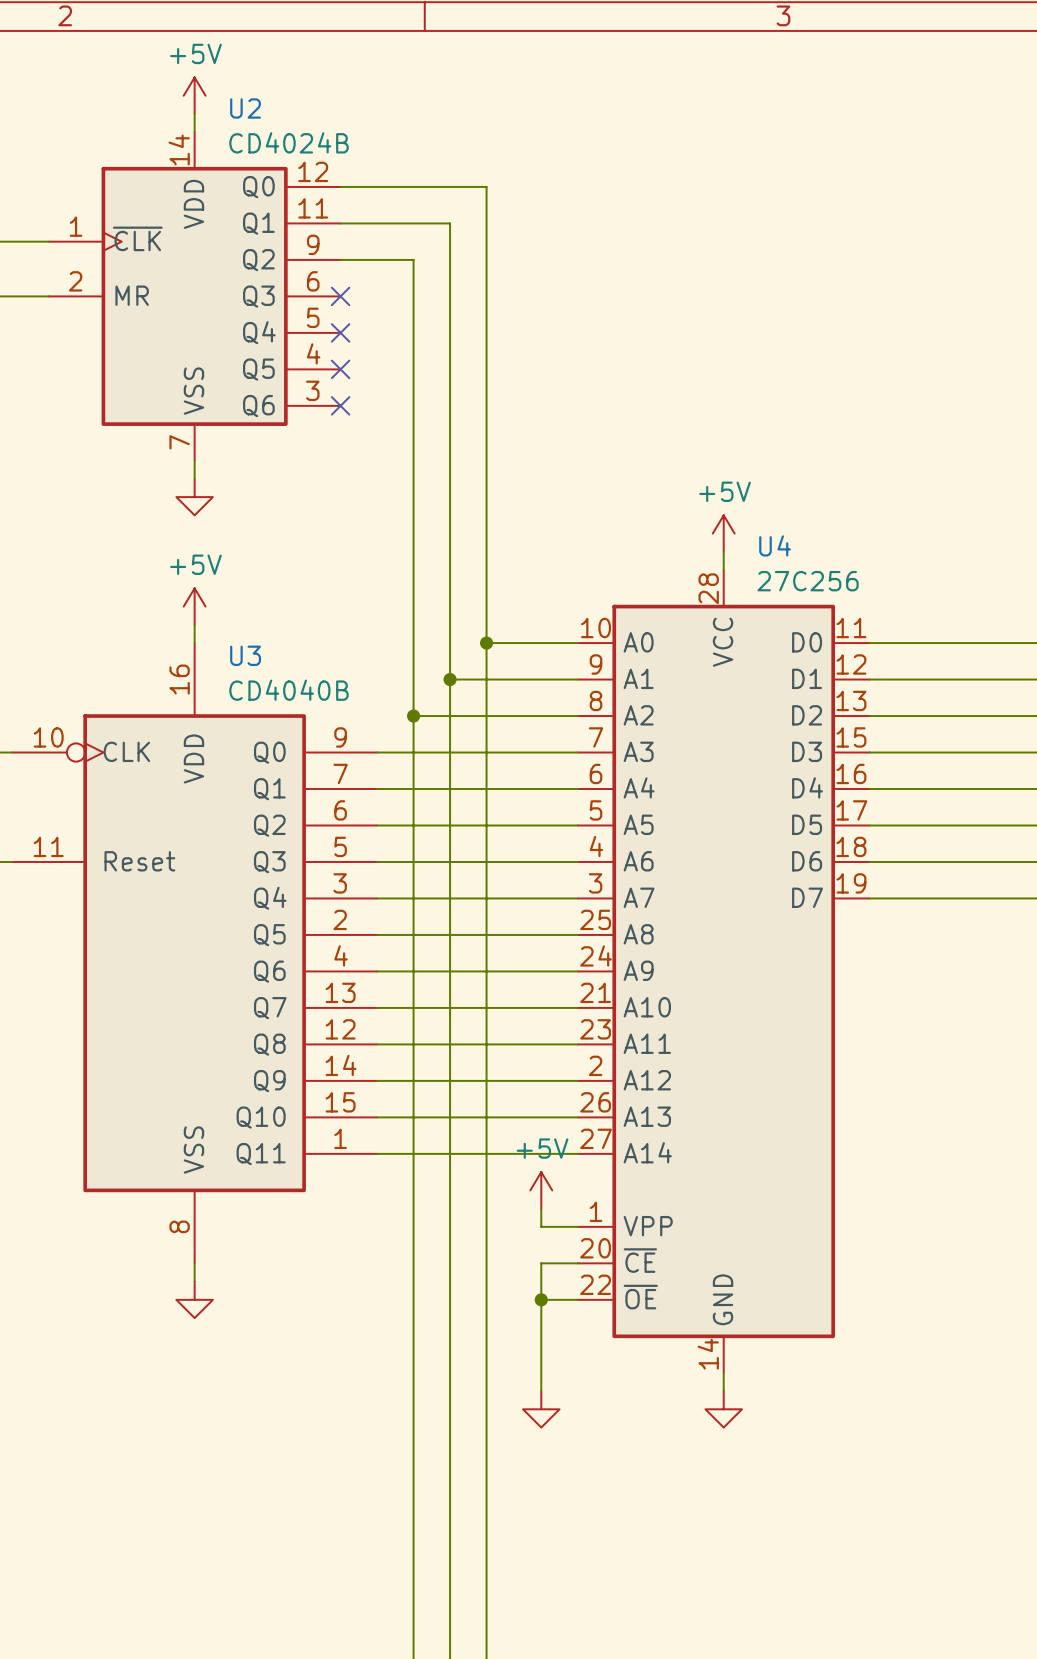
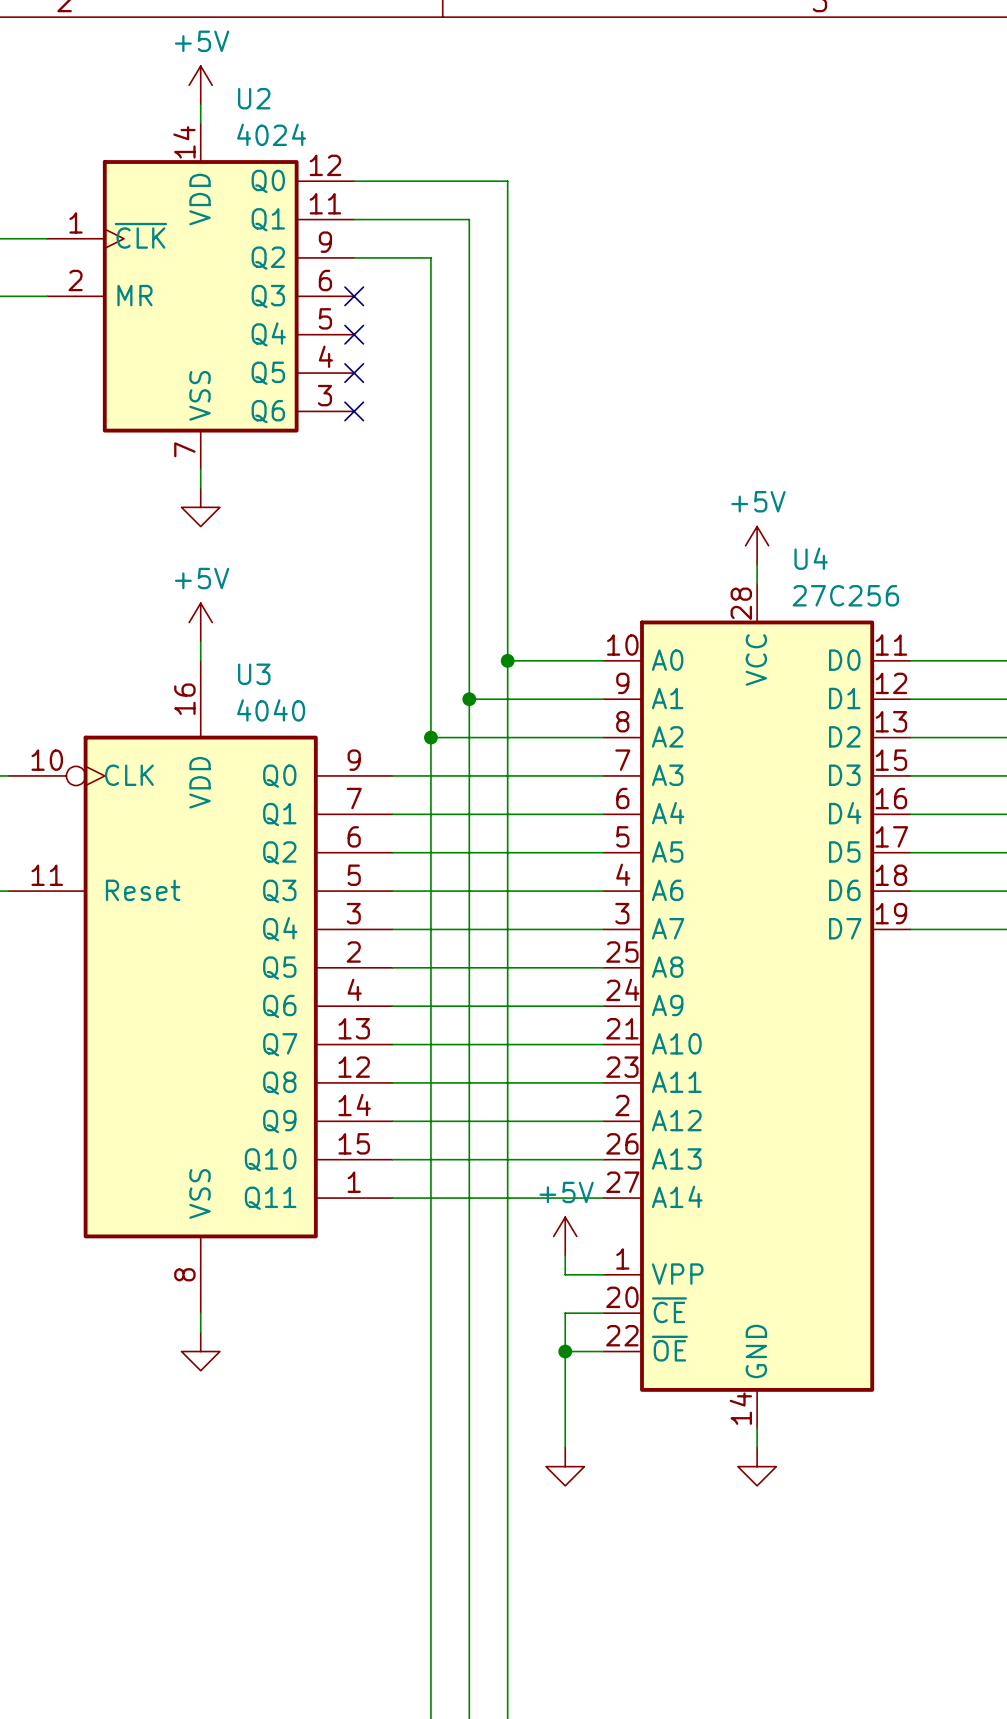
U2 value: CD4024B (288, 142) -> 4024 (271, 134)
U3 value: CD4040B (288, 690) -> 4040 (271, 710)

